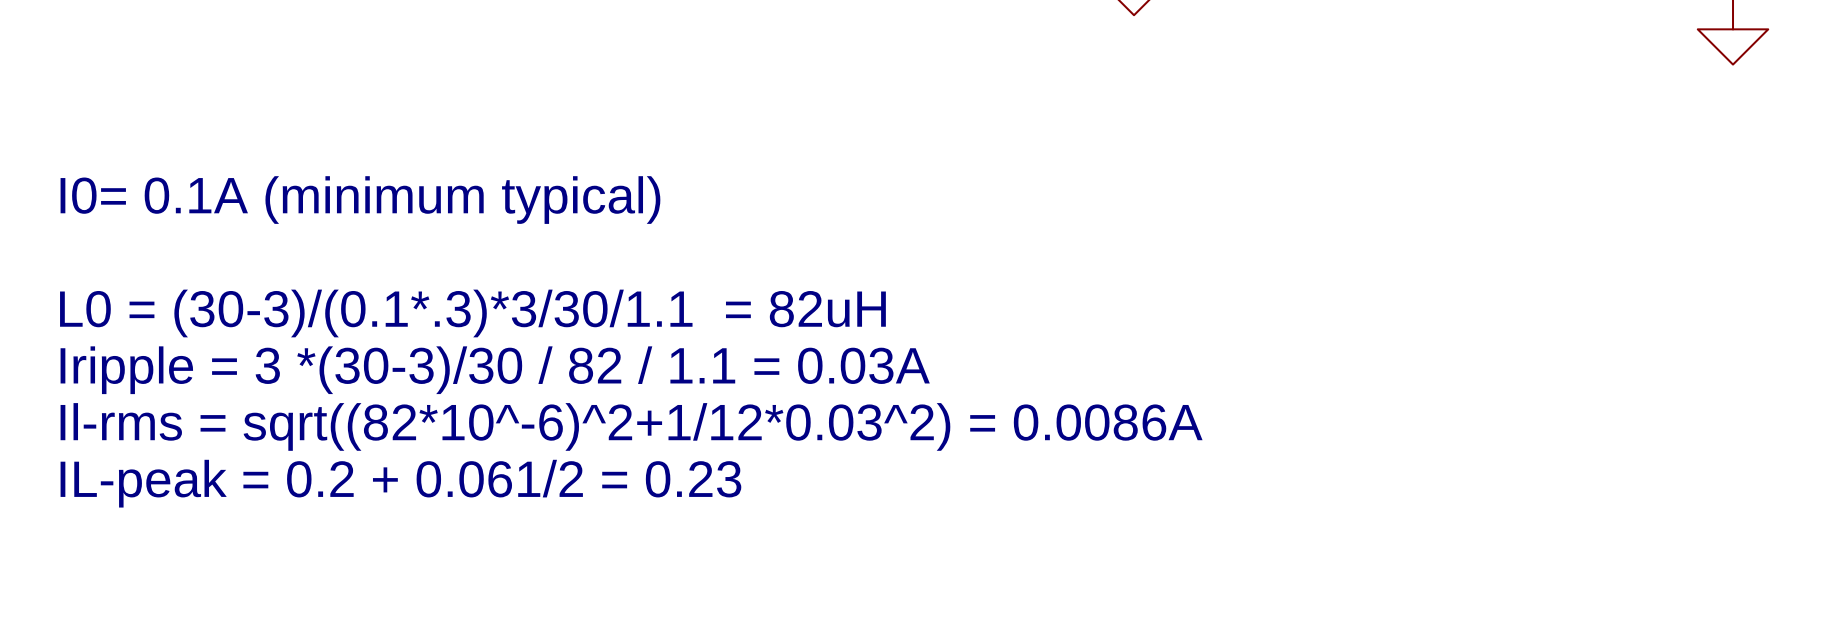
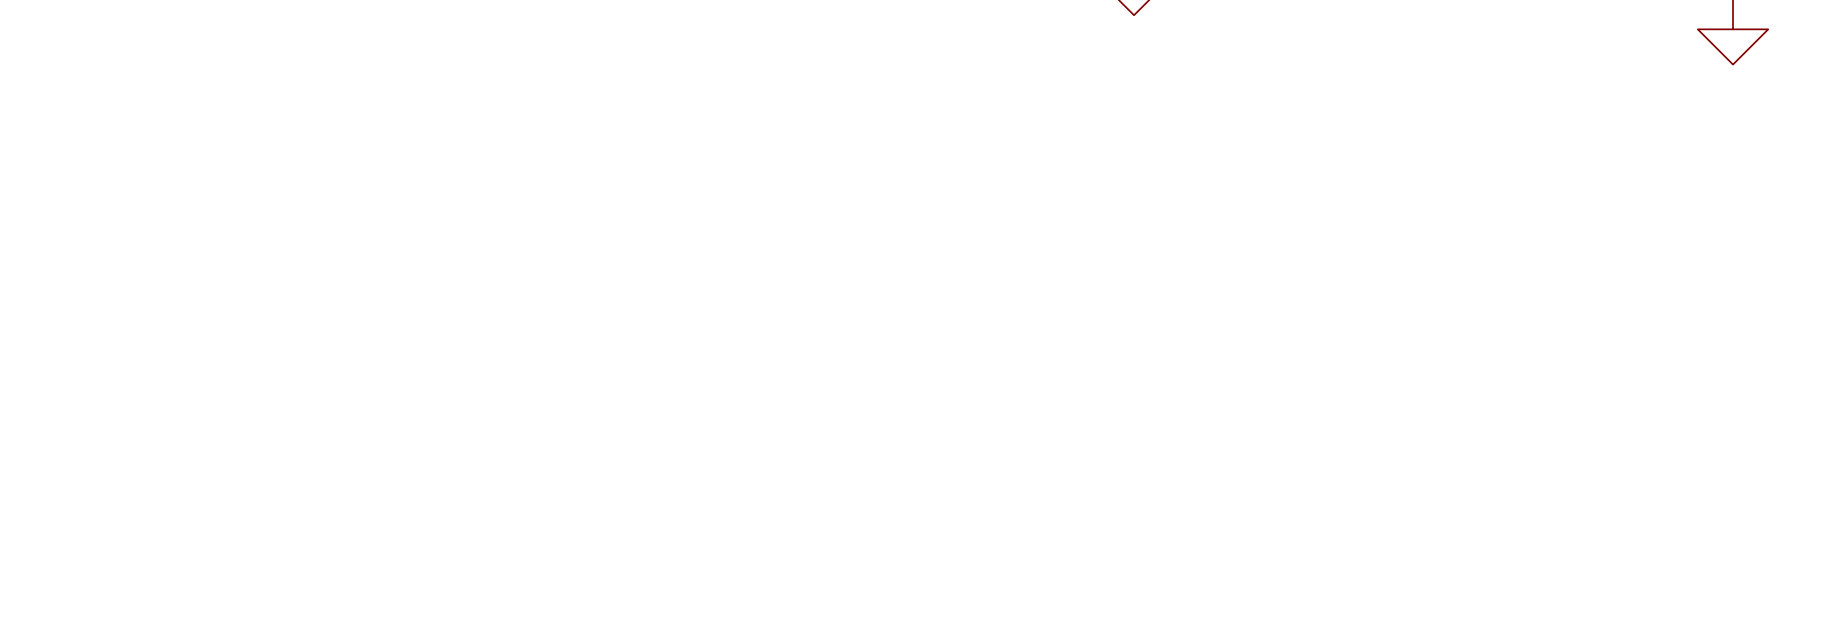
text: I0= 0.1A (minimum typical) (360, 200) -> none
text: L0 = (30-3)/(0.1*.3)*3/30/1.1 = 82uH (472, 313) -> none
text: Iripple = 3 *(30-3)/30 / 82 / 1.1 = 0.03A (495, 370) -> none
text: Il-rms = sqrt((82*10^-6)^2+1/12*0.03^2) = 0.0086A (631, 426) -> none
text: IL-peak = 0.2 + 0.061/2 = 0.23 (400, 483) -> none

